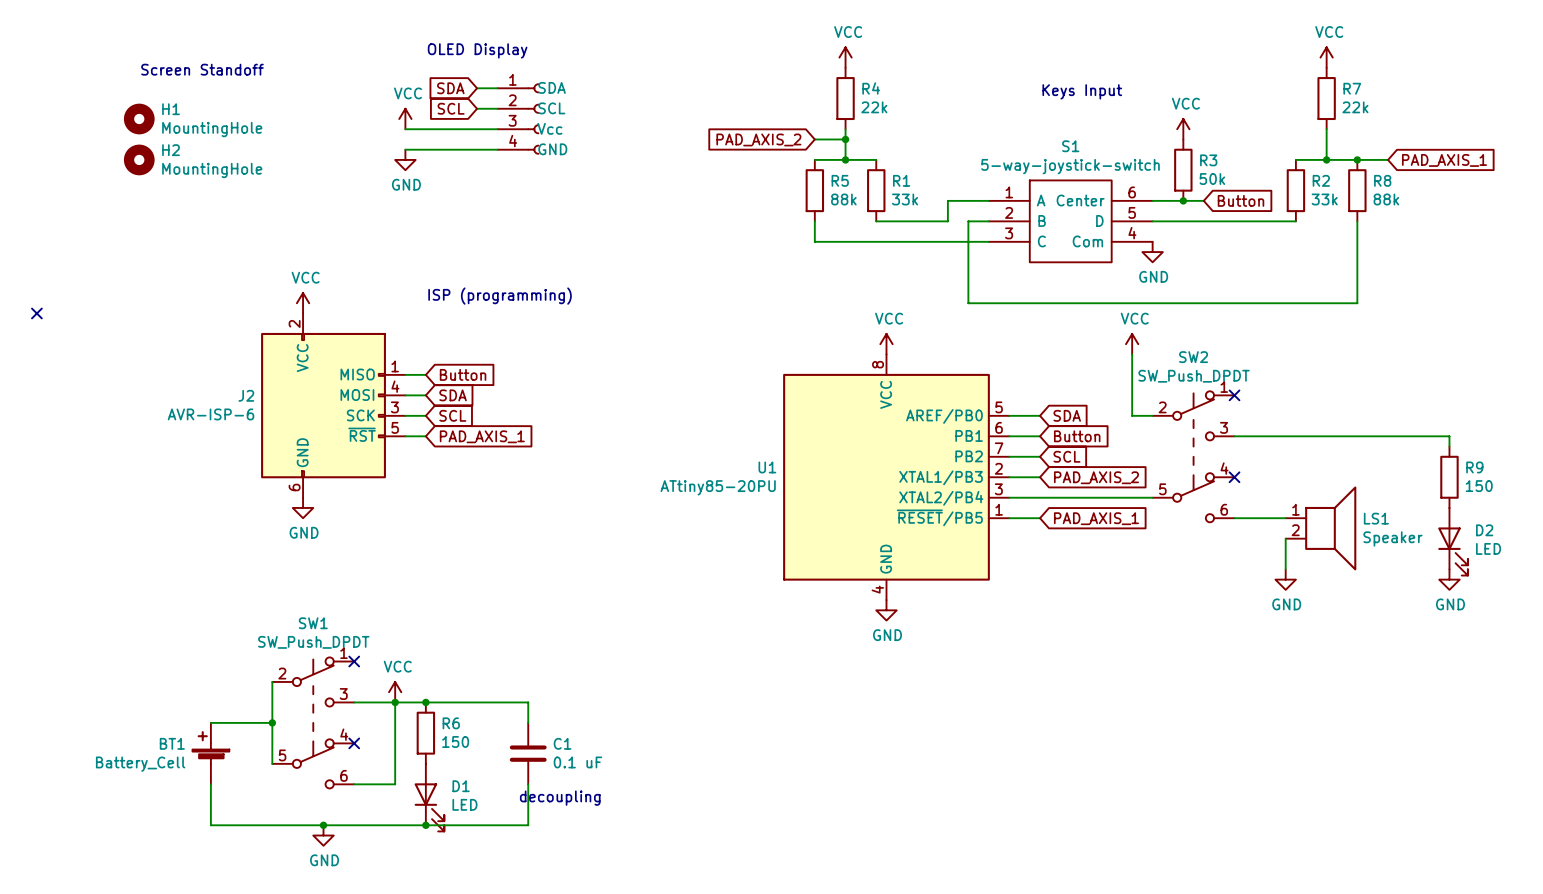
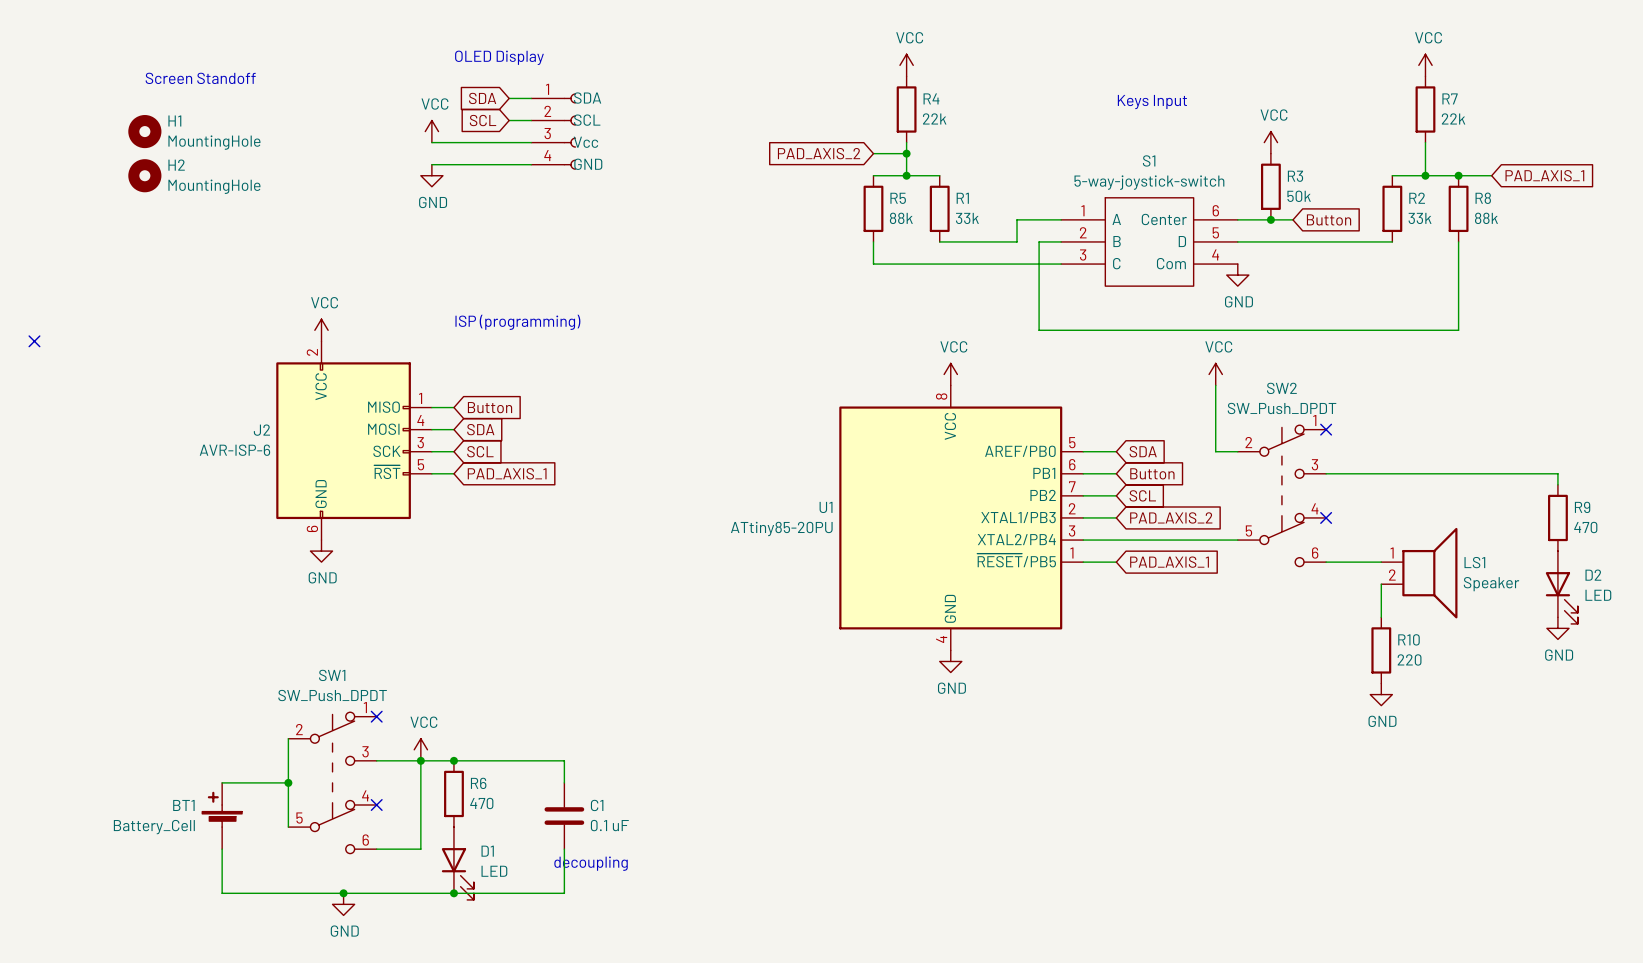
R9 value: 150 (1479, 486) -> 470 (1585, 527)
power symbol position: GND (1285, 579) -> GND (1381, 694)
R10: none -> 220 (1381, 650)
R6 value: 150 (455, 741) -> 470 (481, 803)

